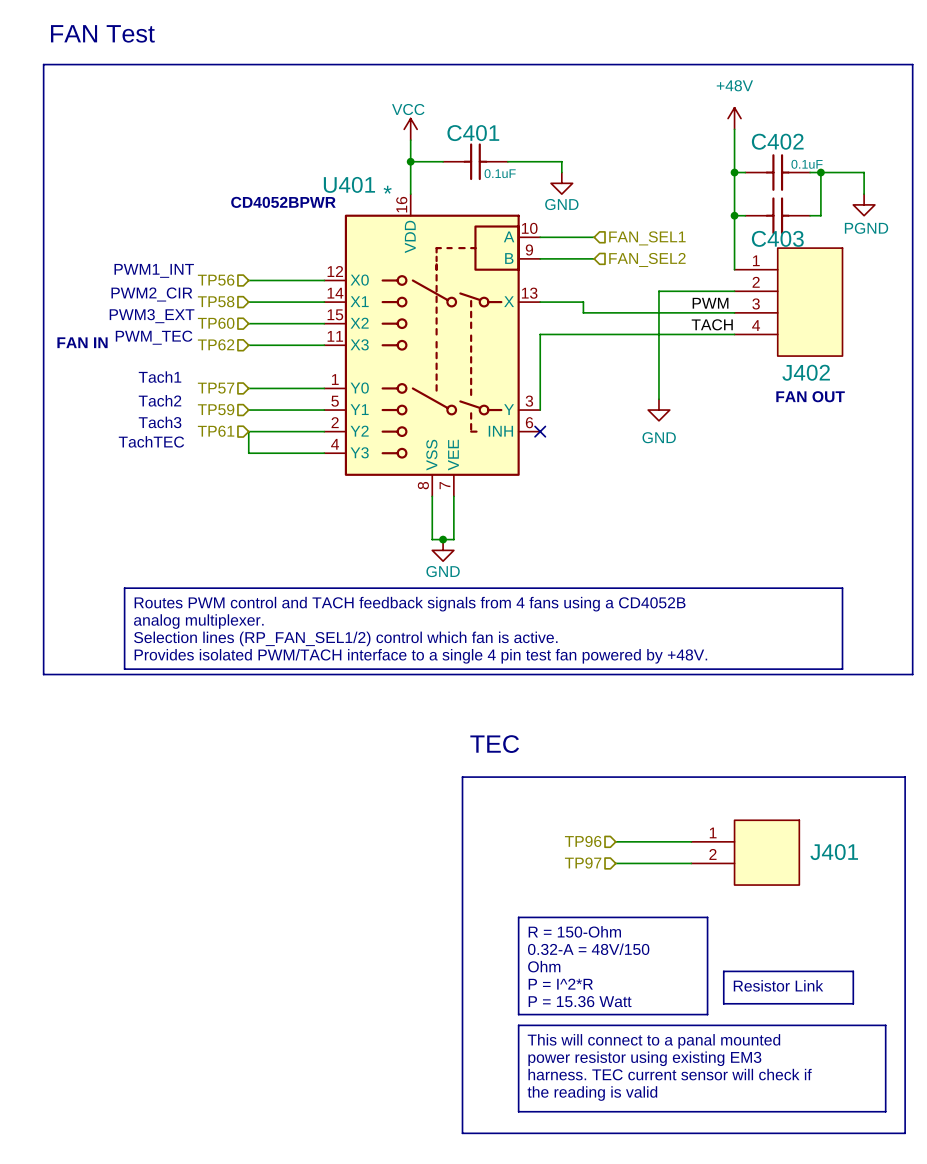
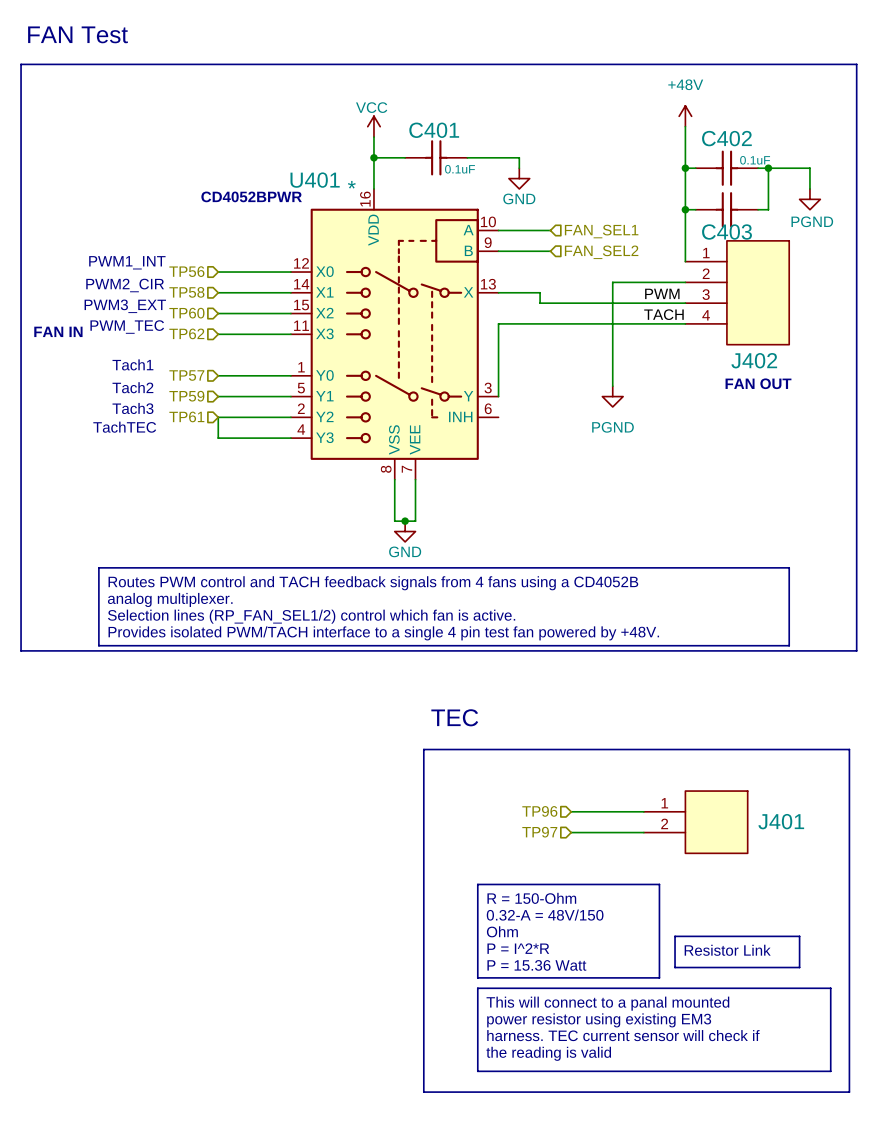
power symbol: GND (658, 410) -> PGND (612, 396)
no-connect mark: (540, 431) -> none

